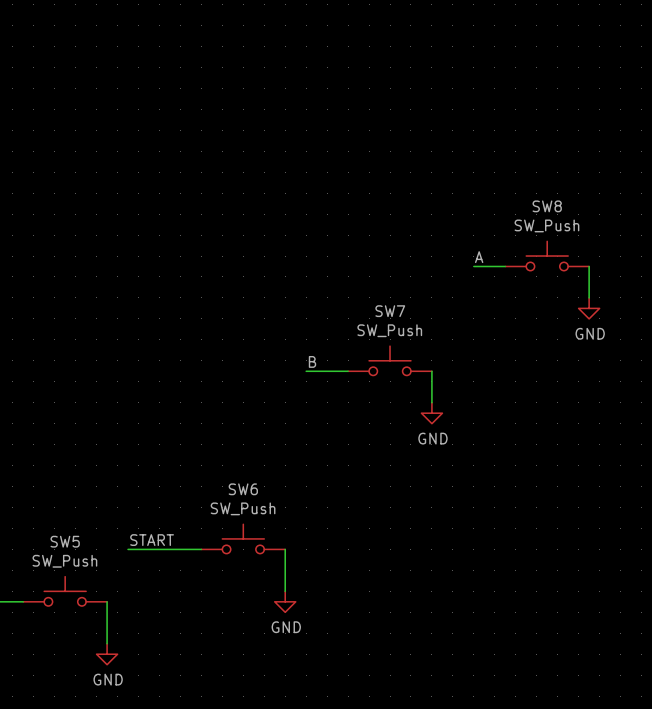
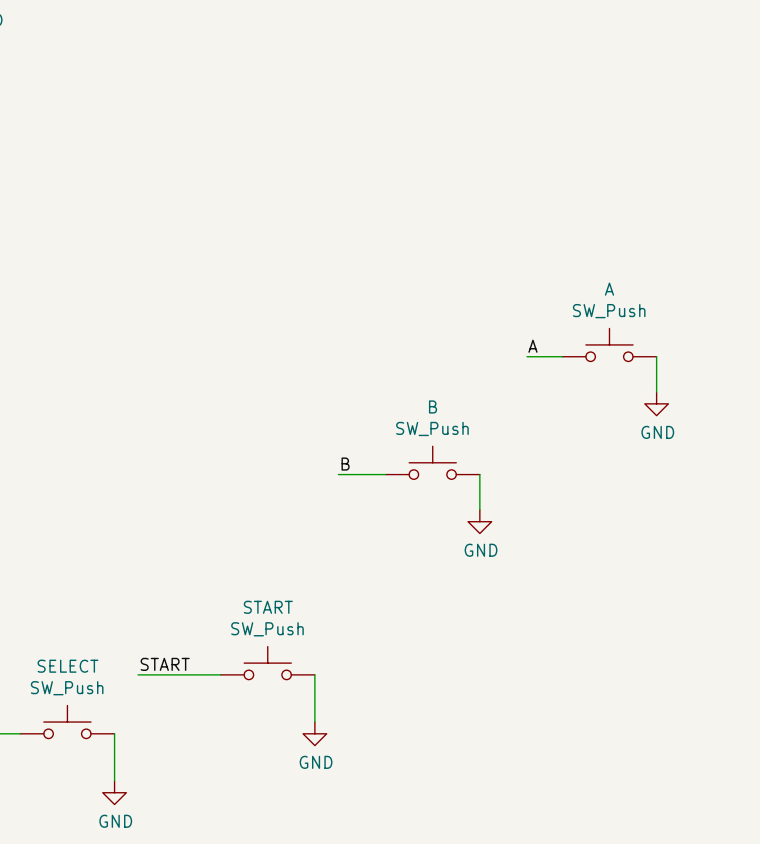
SW8 name: SW8 (547, 206) -> A (609, 289)
SW7 name: SW7 (390, 311) -> B (433, 406)
SW6 name: SW6 (243, 489) -> START (268, 607)
SW5 name: SW5 (65, 541) -> SELECT (67, 666)

